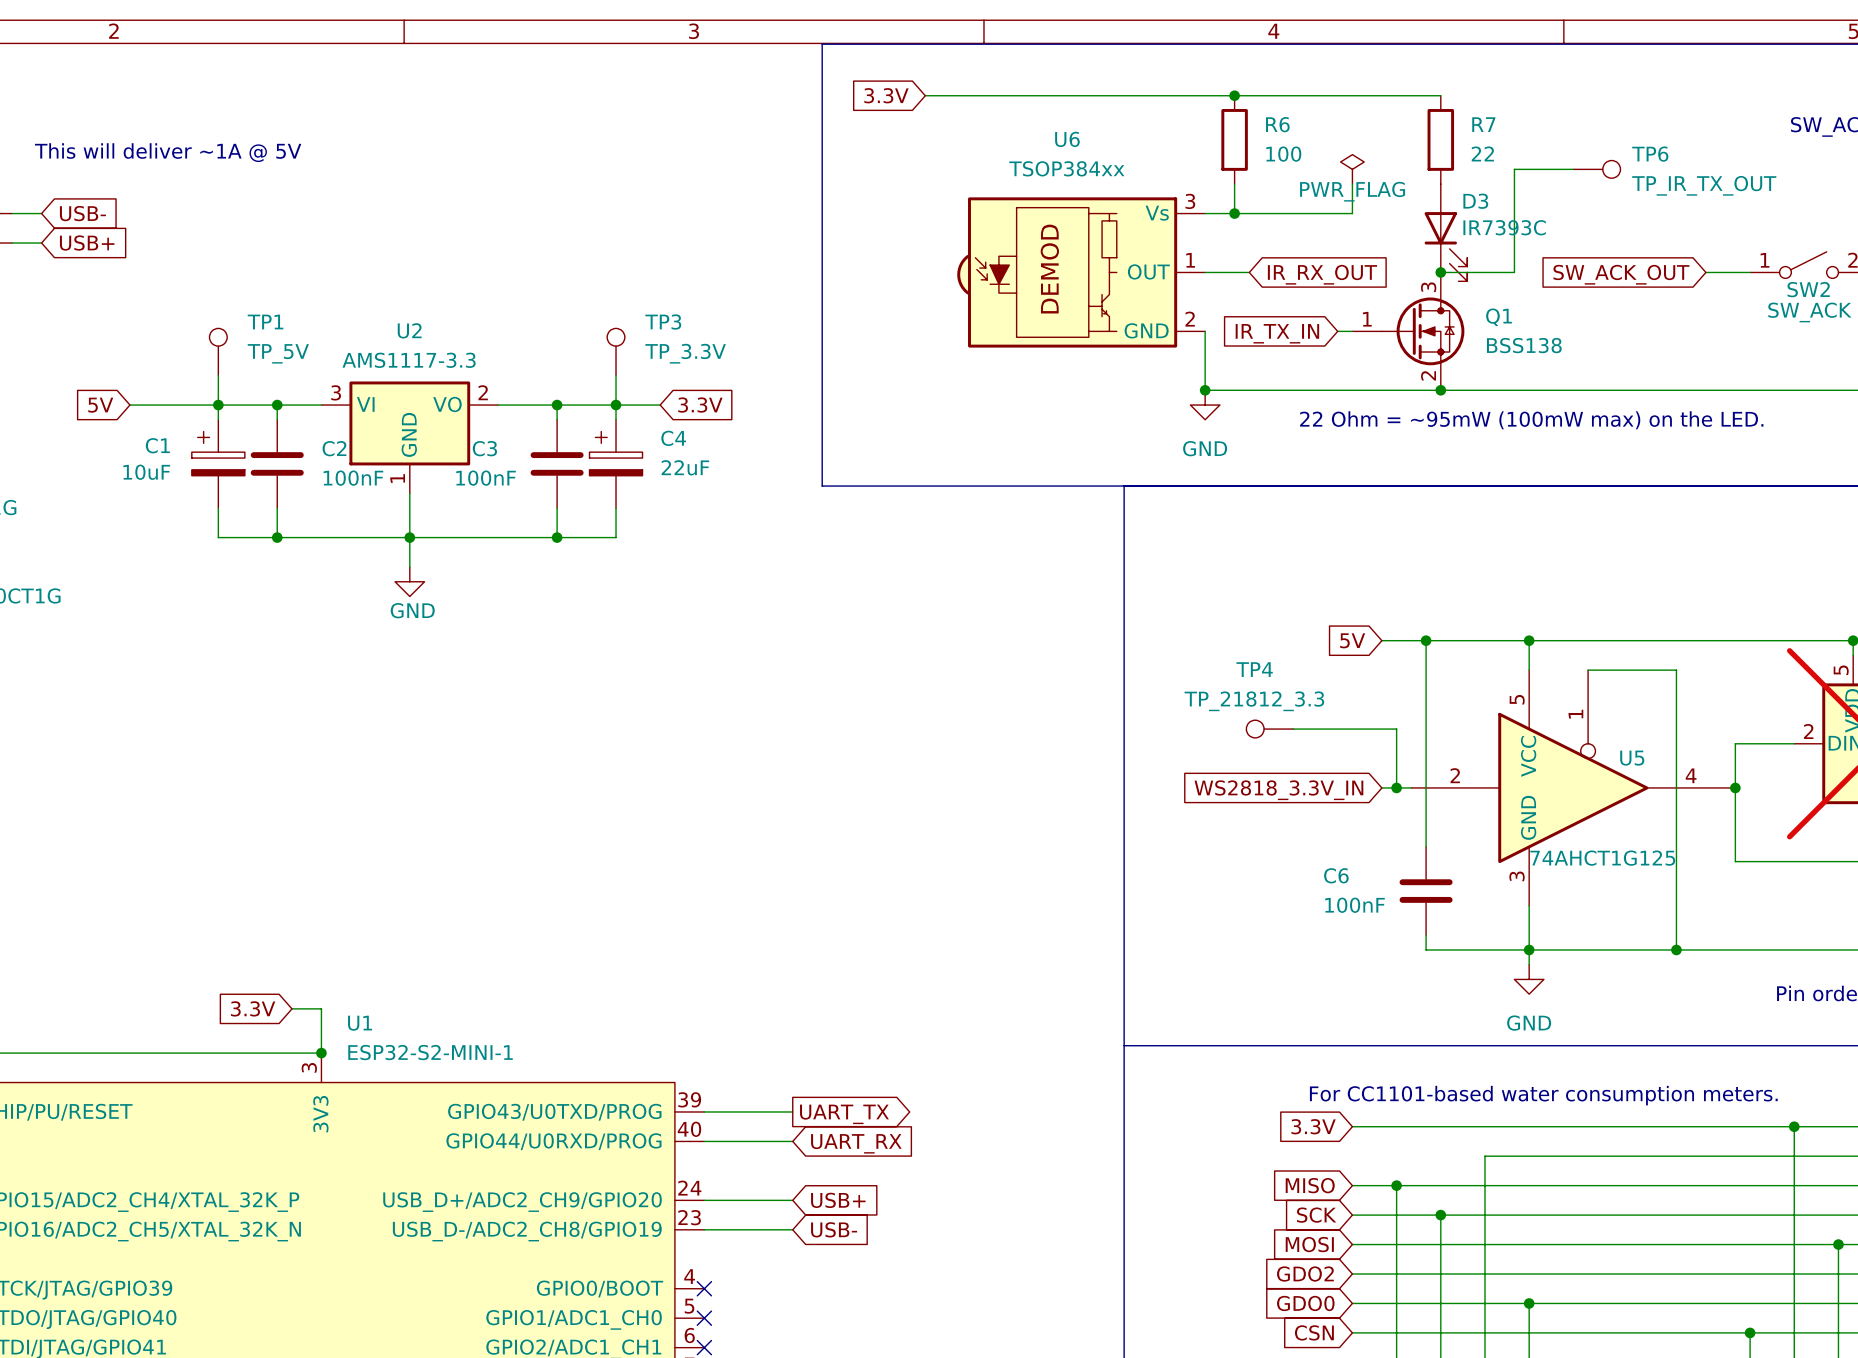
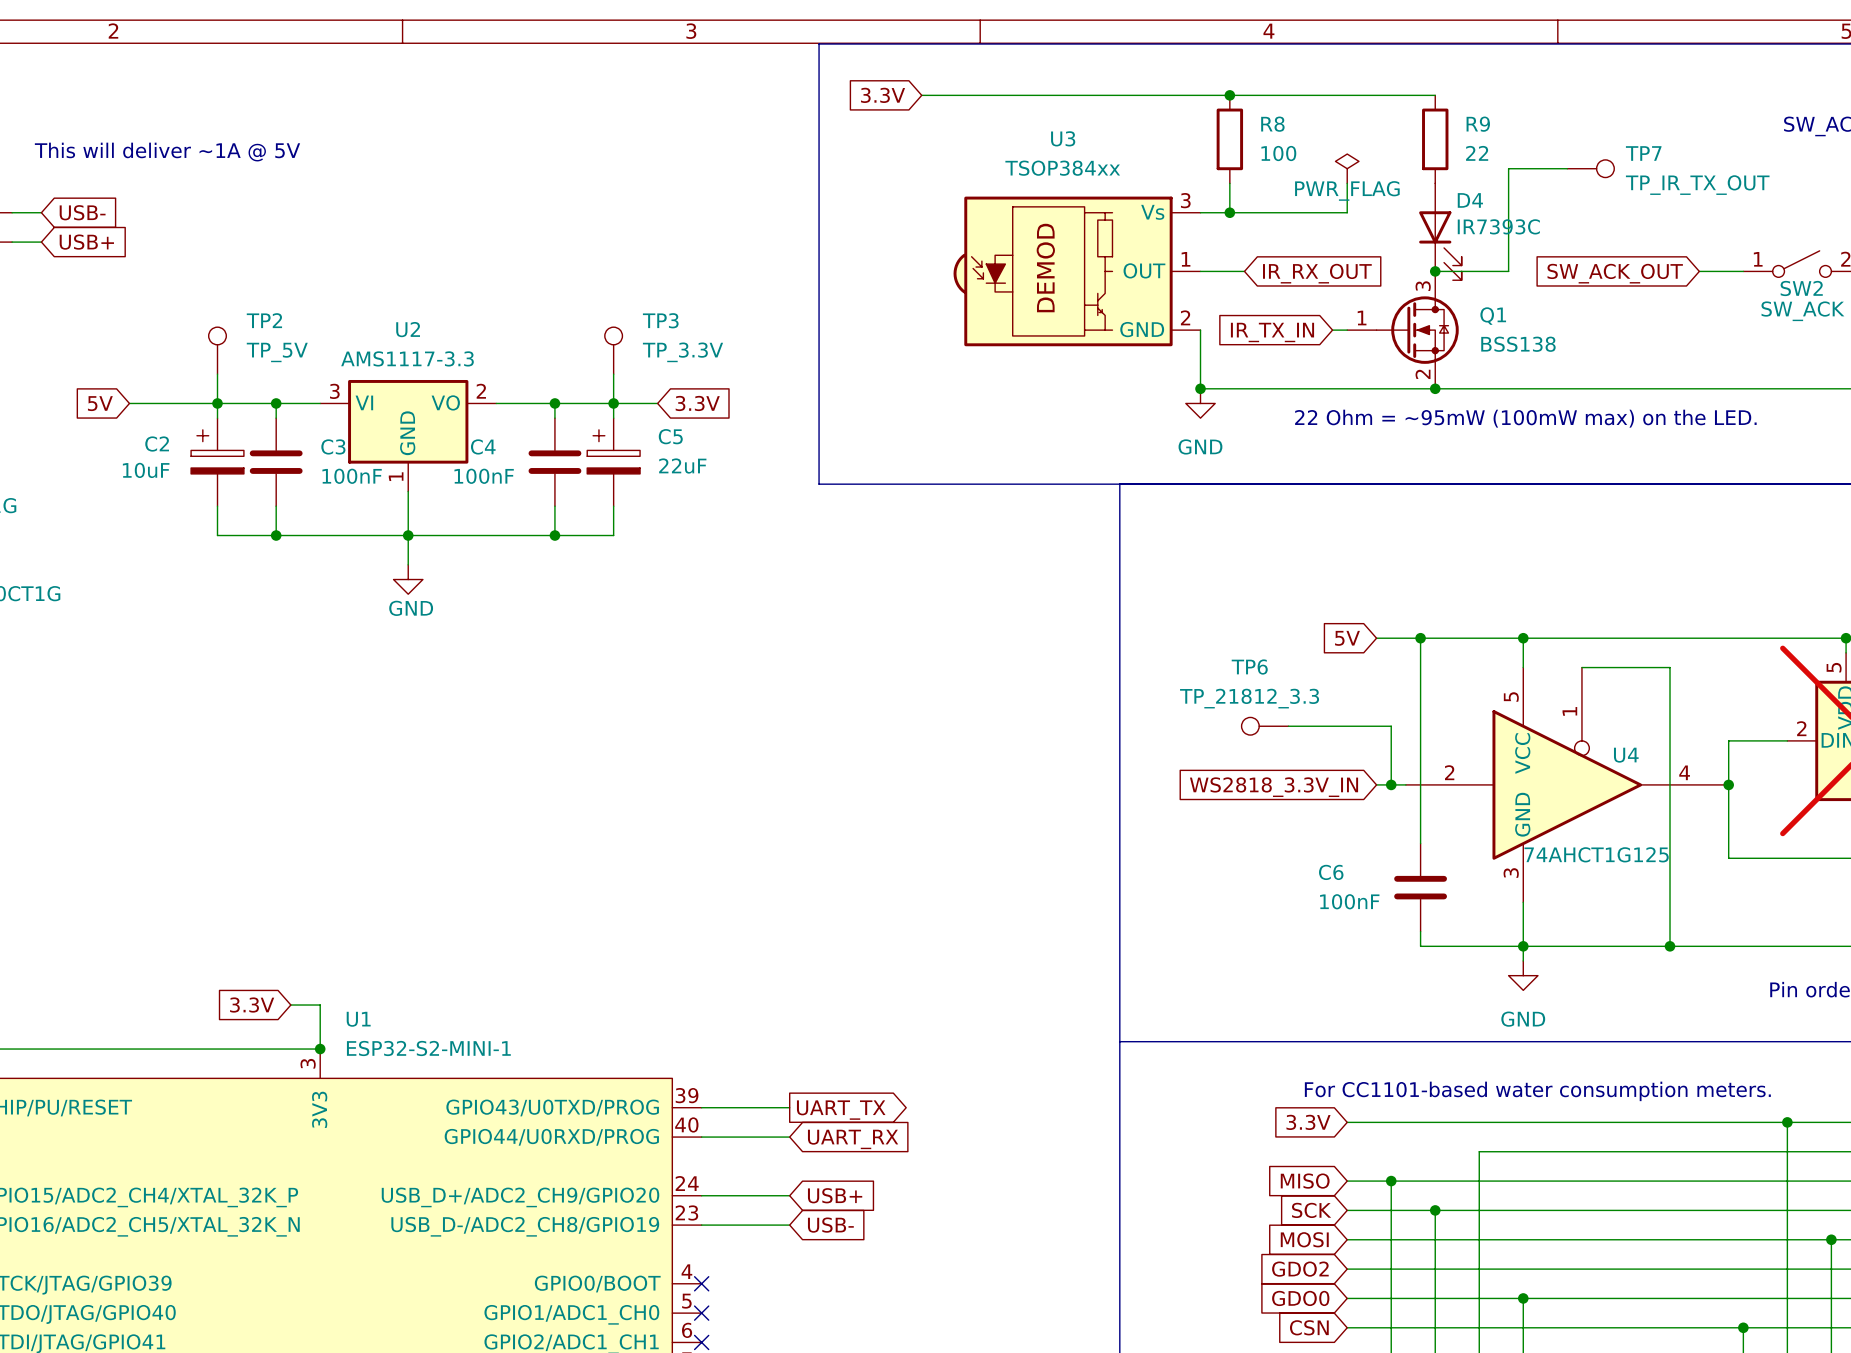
R6 name: R6 (1277, 124) -> R8 (1272, 124)
R7 name: R7 (1483, 124) -> R9 (1478, 124)
U6 name: U6 (1067, 139) -> U3 (1063, 138)
TP6 name: TP6 (1650, 154) -> TP7 (1643, 153)
D3 name: D3 (1475, 201) -> D4 (1470, 200)
TP1 name: TP1 (265, 321) -> TP2 (264, 320)
C4 name: C4 (673, 438) -> C5 (670, 436)
C1 name: C1 (157, 445) -> C2 (157, 444)
C2 name: C2 (334, 448) -> C3 (333, 446)
C3 name: C3 (484, 448) -> C4 (483, 446)
TP4 name: TP4 (1254, 669) -> TP6 (1249, 667)
U5 name: U5 (1632, 758) -> U4 (1626, 755)

